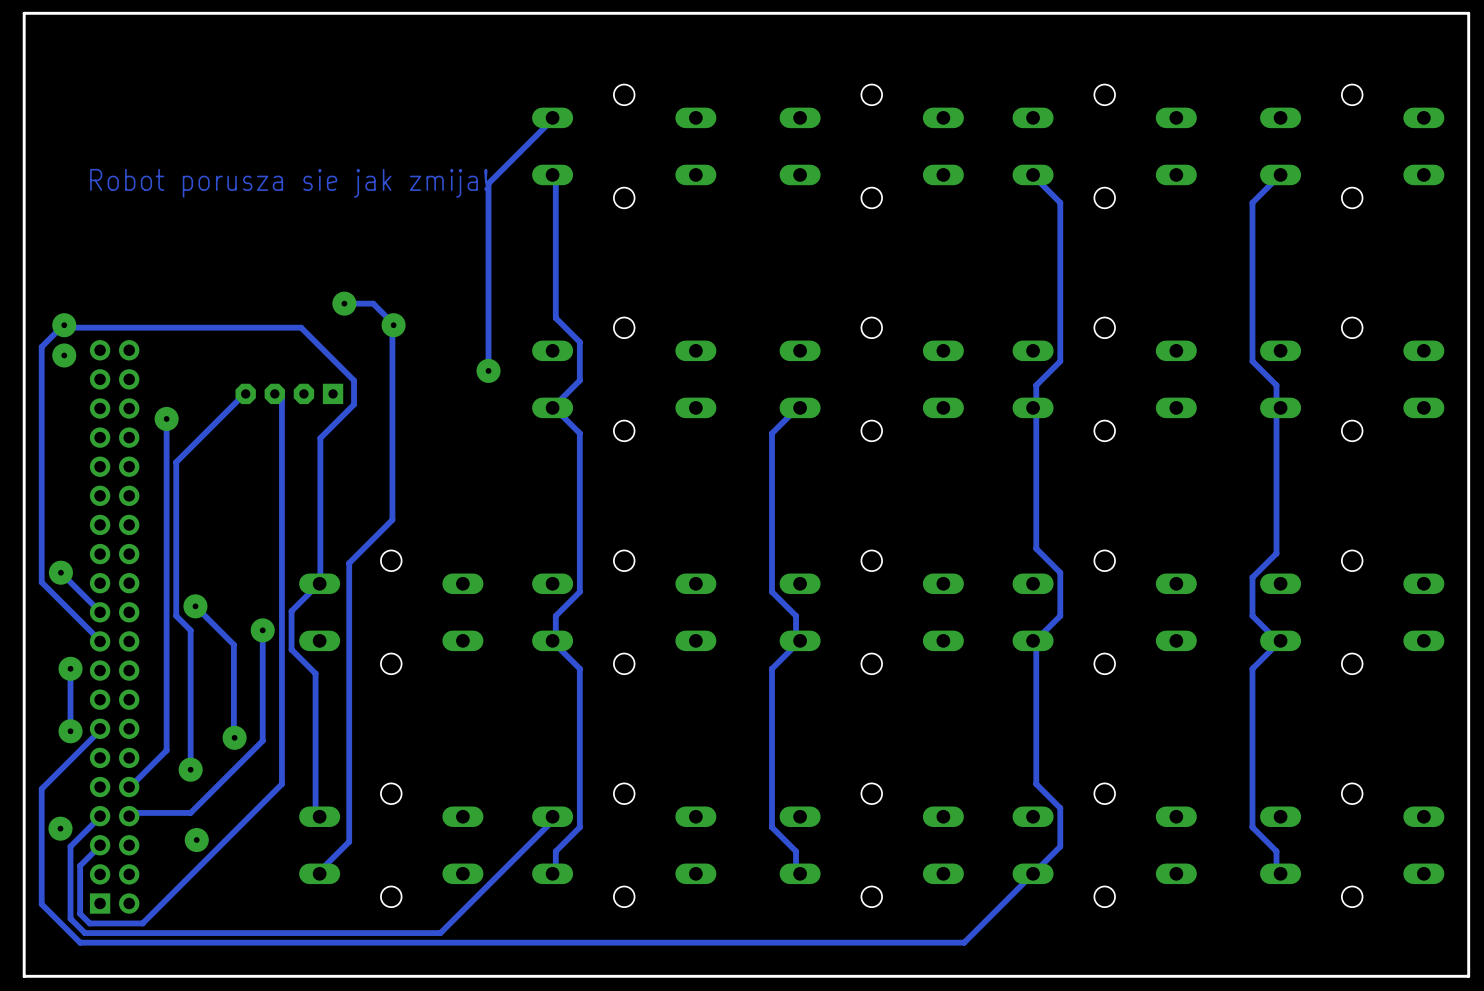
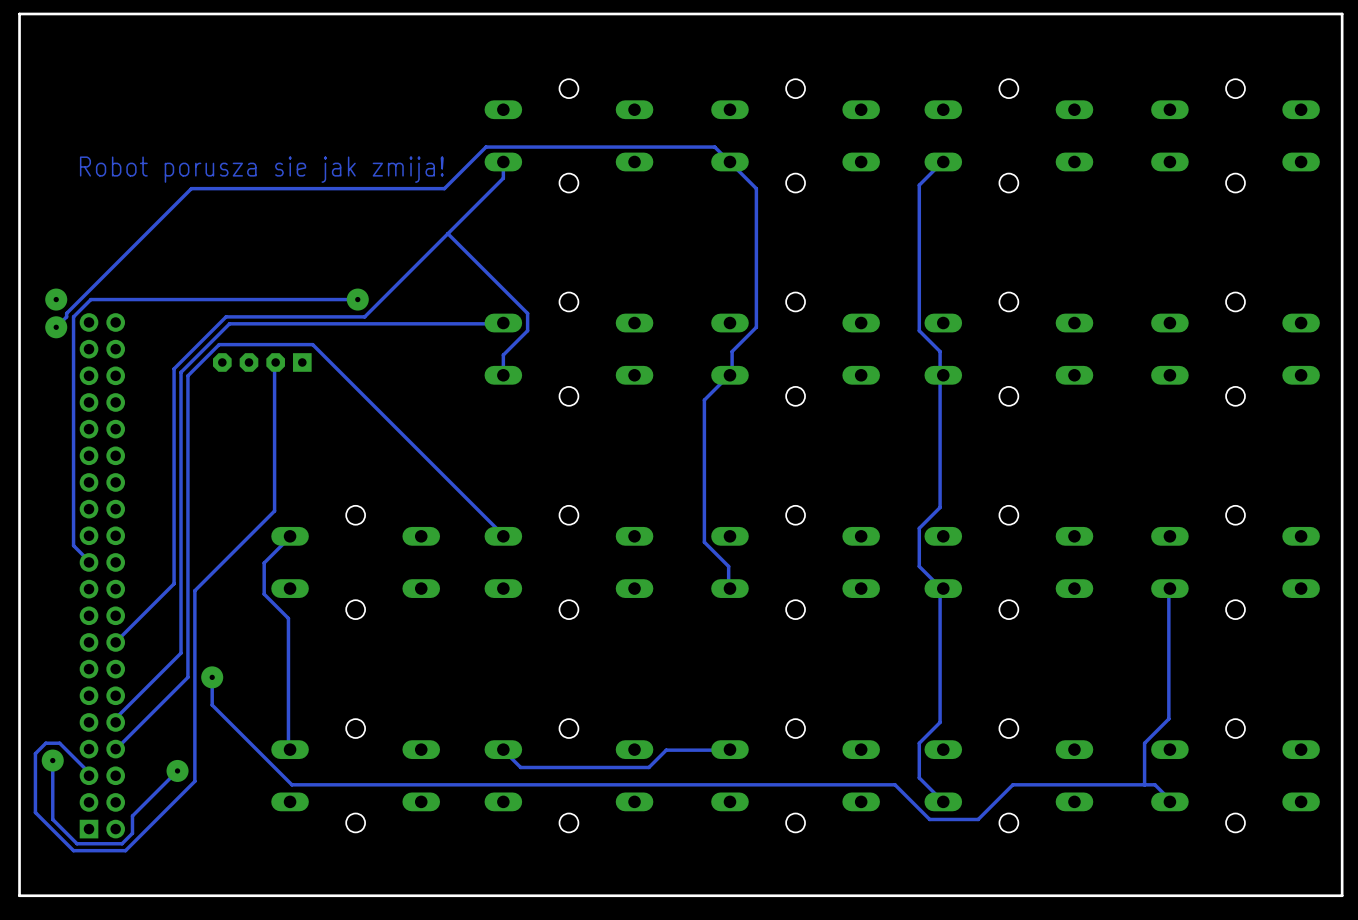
track: (552, 117) (488, 183) (488, 370) -> none
track: (552, 174) (555, 178) (555, 318) (579, 342) (579, 380) (552, 407) (579, 433) (579, 591) (555, 615) (555, 639) (552, 640) (579, 668) (579, 827) (555, 851) (555, 870) (552, 873) -> (503, 161) (503, 178) (364, 316) (226, 316) (174, 368) (174, 583) (115, 642)
track: (1033, 174) (1060, 202) (1060, 361) (1036, 385) (1036, 404) (1033, 407) (1036, 409) (1036, 548) (1060, 572) (1060, 615) (1036, 639) (1033, 640) (1036, 644) (1036, 784) (1060, 808) (1060, 846) (964, 942) (80, 942) (41, 904) (41, 788) (100, 728) -> (943, 161) (919, 185) (919, 330) (940, 351) (940, 372) (943, 375) (940, 375) (940, 507) (919, 528) (919, 566) (943, 588) (940, 590) (940, 722) (919, 743) (919, 777) (943, 801)
track: (1280, 174) (1252, 202) (1252, 361) (1276, 385) (1276, 404) (1280, 407) (1276, 409) (1276, 553) (1252, 577) (1252, 615) (1276, 639) (1280, 640) (1252, 668) (1252, 827) (1276, 851) (1276, 870) (1280, 873) -> none
track: none -> (447, 233) (527, 313) (527, 330) (503, 355) (503, 375)
track: (344, 303) (373, 303) (393, 325) (392, 519) (349, 563) (349, 841) (320, 870) (319, 873) -> none
via: (344, 303) -> none
track: none -> (56, 327) (66, 316) (66, 313) (191, 188) (444, 188) (486, 147) (714, 147) (756, 188) (756, 327) (732, 351) (732, 372) (704, 400) (704, 542) (728, 566) (729, 588)
via: (488, 370) -> none
track: (245, 393) (176, 462) (176, 615) (190, 630) (190, 769) -> none
track: (274, 393) (281, 399) (281, 784) (142, 923) (89, 923) (80, 913) (80, 865) (100, 845) -> (275, 362) (274, 510) (194, 590) (194, 781) (125, 850) (73, 850) (35, 812) (35, 753) (45, 743) (59, 743) (90, 774) (89, 775)
track: (800, 407) (796, 409) (772, 433) (772, 591) (796, 615) (796, 639) (800, 640) (772, 668) (772, 827) (796, 851) (796, 870) (800, 873) -> none
track: (166, 418) (166, 750) (129, 787) -> (503, 323) (229, 323) (181, 372) (181, 653) (118, 715) (118, 722) (115, 722)
via: (166, 418) -> none
track: (60, 572) (100, 612) -> (357, 299) (90, 299) (73, 316) (73, 545) (89, 562)
via: (60, 572) -> none
track: (195, 606) (233, 644) (234, 737) -> (1169, 801) (1154, 784) (1012, 784) (978, 819) (929, 819) (895, 784) (291, 784) (212, 705) (212, 677)
via: (195, 606) -> none
track: (262, 630) (262, 740) (190, 812) (132, 812) (129, 816) -> (503, 536) (312, 344) (219, 344) (187, 375) (187, 677) (115, 749)
via: (262, 630) -> none
track: none -> (1169, 588) (1168, 718) (1144, 743) (1144, 784)
track: (100, 641) (41, 582) (41, 346) (64, 325) (65, 327) (301, 327) (354, 380) (354, 404) (320, 438) (320, 582) (291, 611) (291, 649) (315, 673) (315, 812) (319, 816) -> (290, 536) (264, 562) (264, 594) (288, 618) (288, 746) (290, 749)
track: (70, 668) (70, 731) -> none
via: (70, 668) -> none
via: (70, 731) -> none
via: (190, 769) -> none
track: (100, 816) (70, 846) (70, 918) (84, 933) (440, 933) (555, 817) (552, 816) -> (729, 749) (666, 750) (648, 767) (520, 767) (503, 749)
track: none -> (52, 760) (52, 819) (77, 843) (122, 843) (132, 833) (132, 816) (177, 770)

